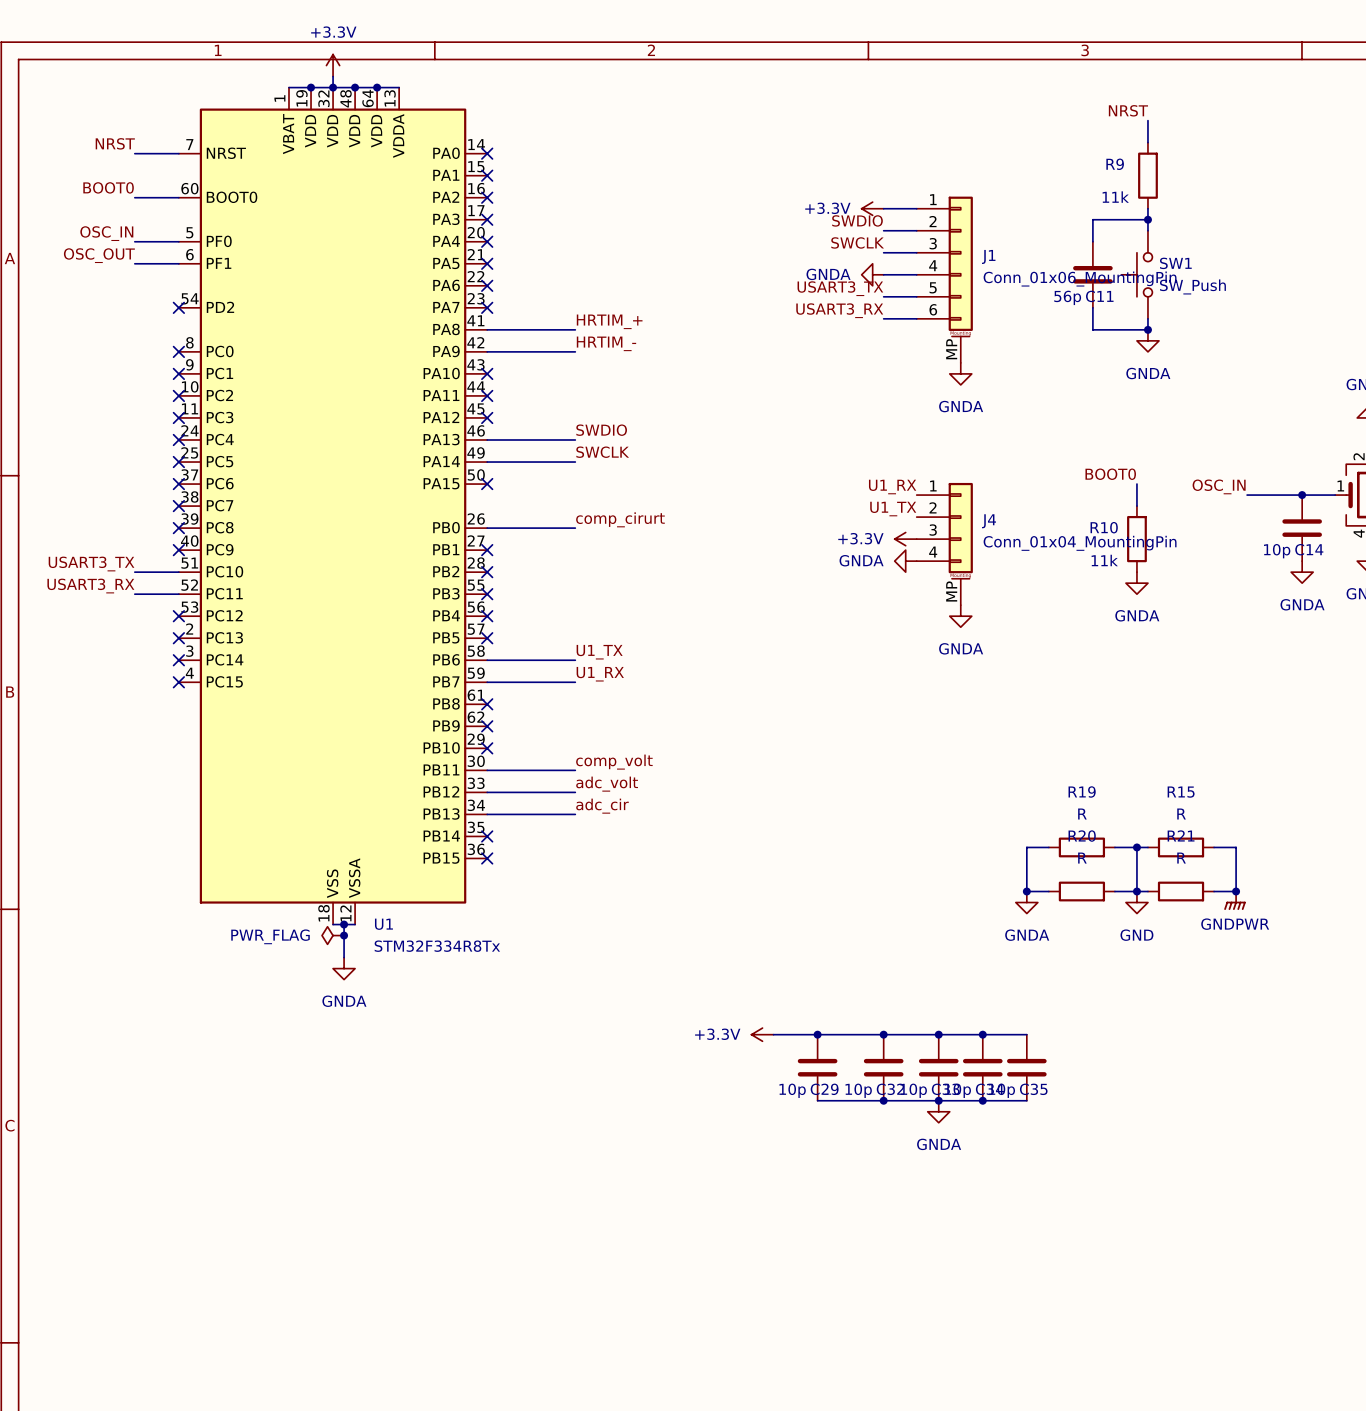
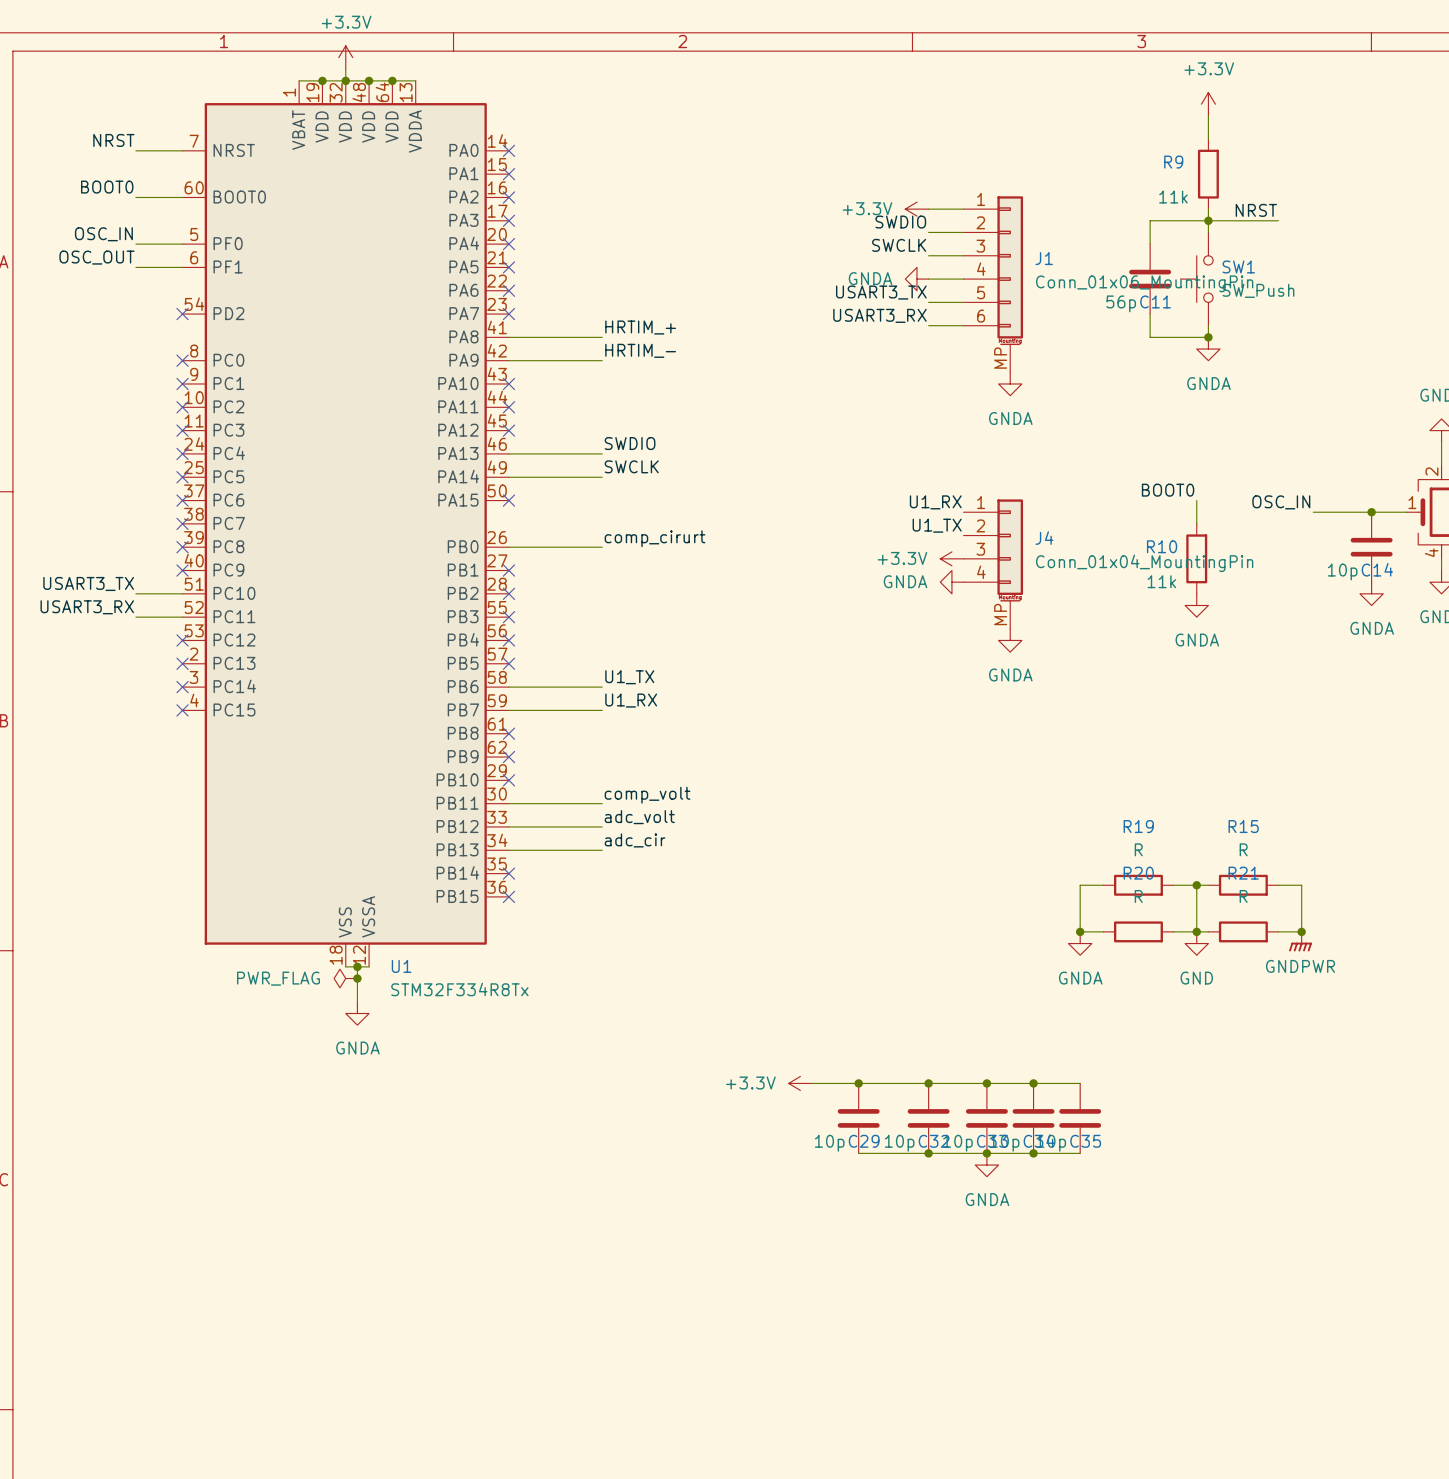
power symbol: none -> +3.3V (1208, 104)
label position: NRST (1128, 110) -> NRST (1256, 210)
wire: none -> (1208, 220) (1278, 220)

